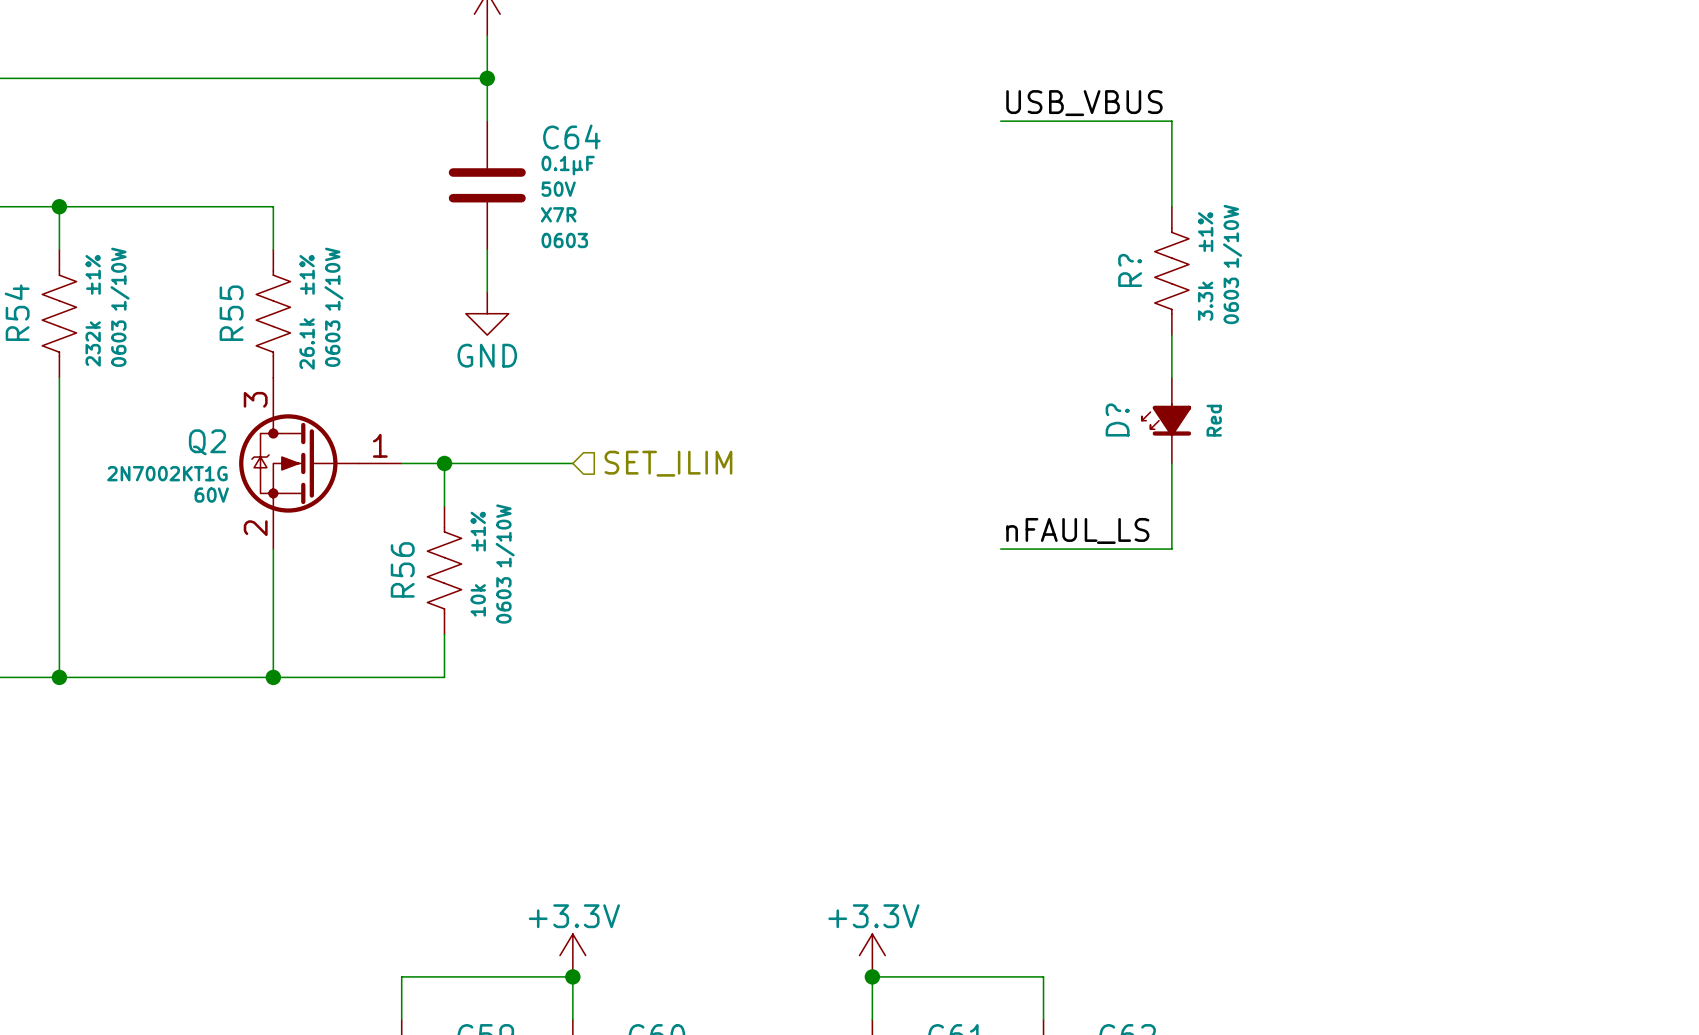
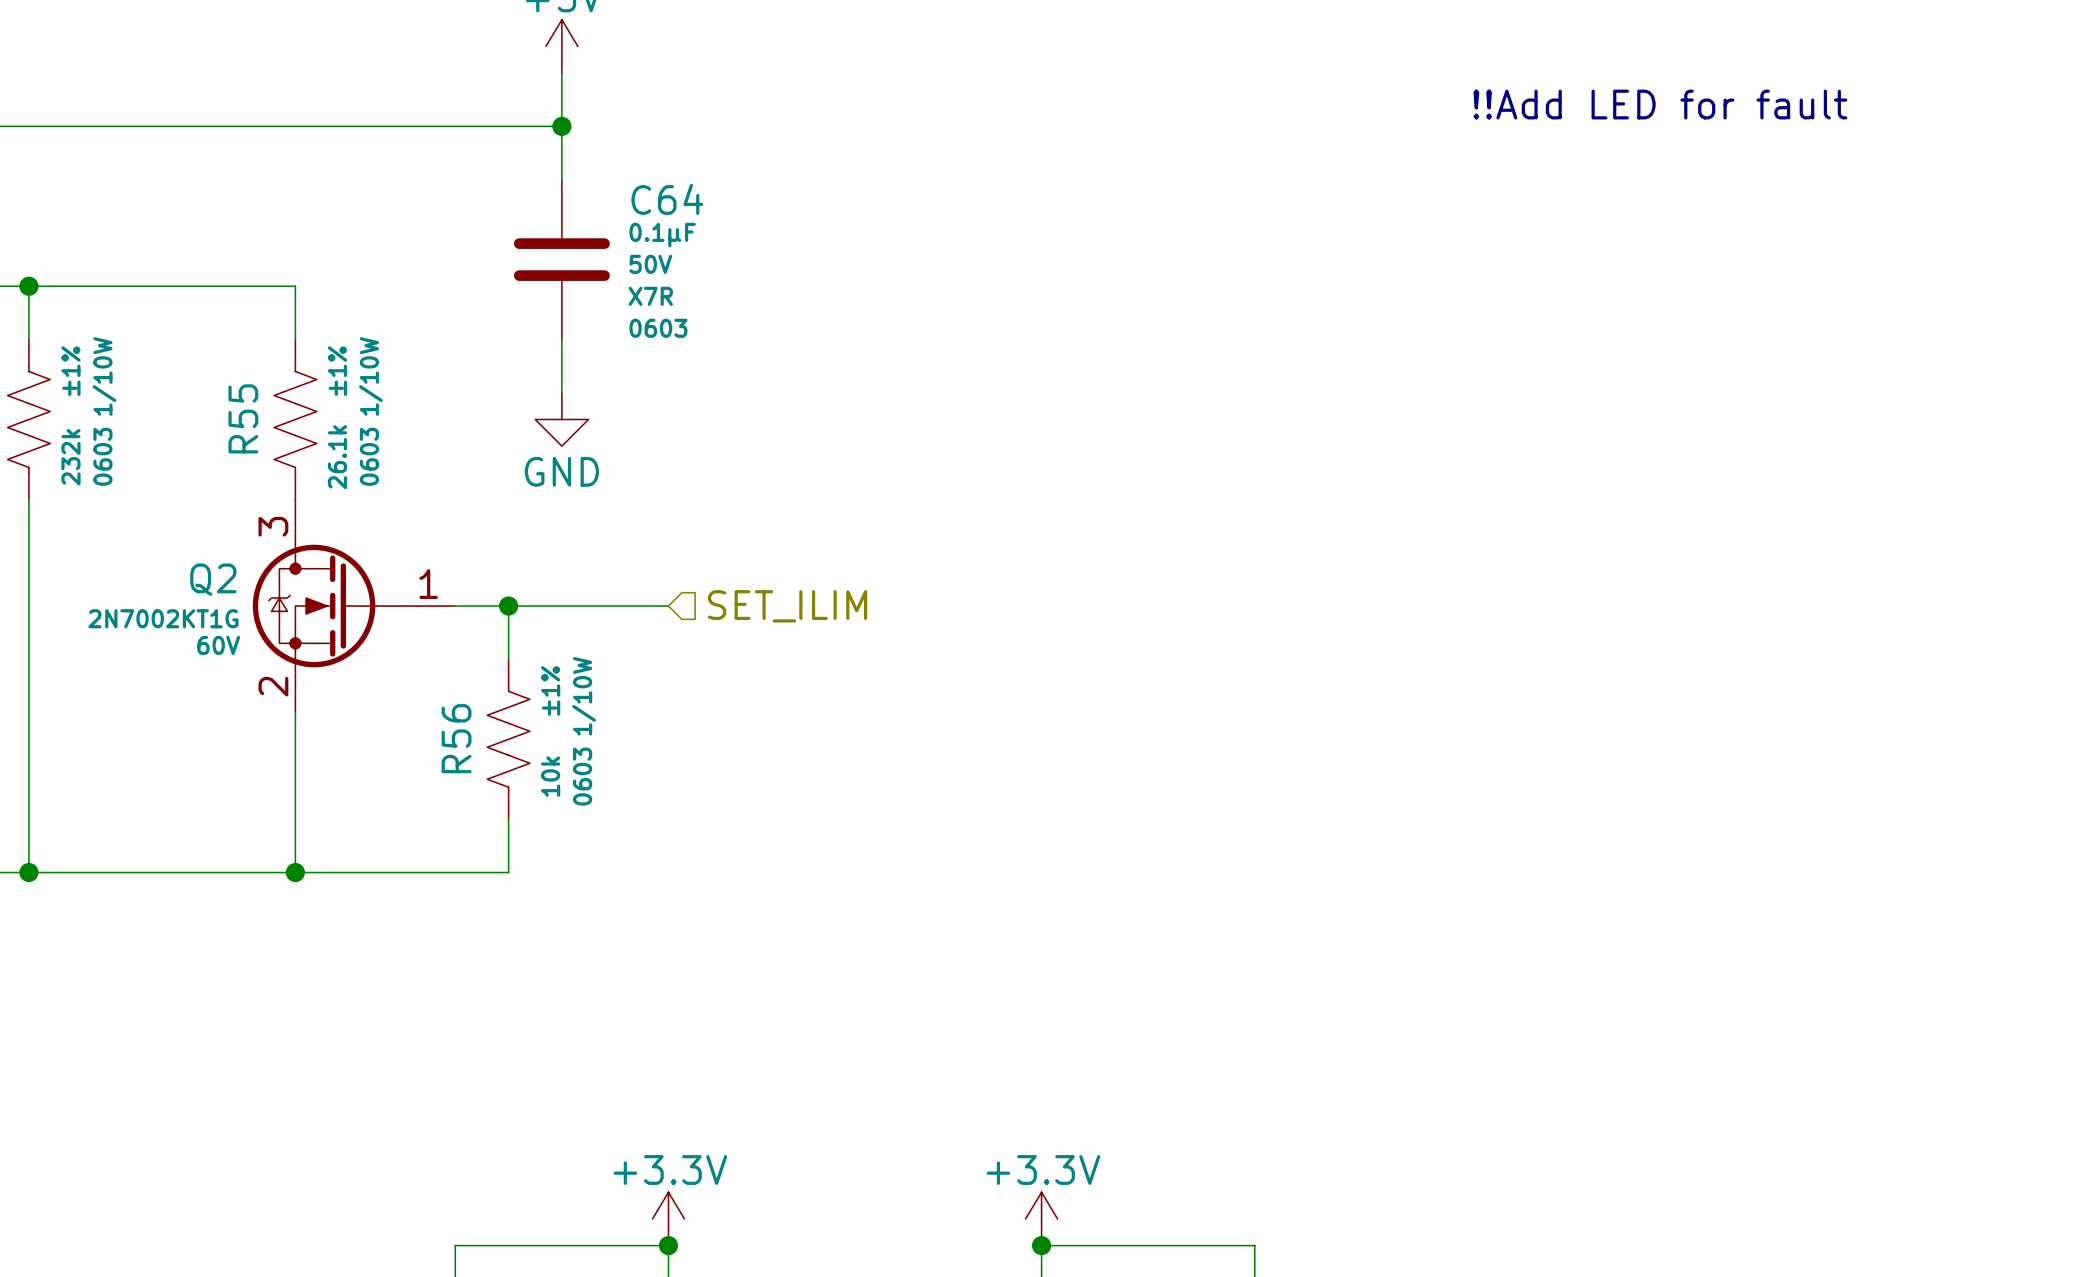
text: none -> !!Add LED for fault (1660, 104)
label: USB_VBUS (1084, 103) -> none
wire: (1000, 121) (1171, 121) (1171, 206) -> none
R?: (1171, 270) -> none
wire: (1171, 335) (1171, 377) -> none
D?: (1166, 420) -> none
wire: (1171, 463) (1171, 549) (1000, 549) -> none
label: nFAUL_LS (1077, 530) -> none

